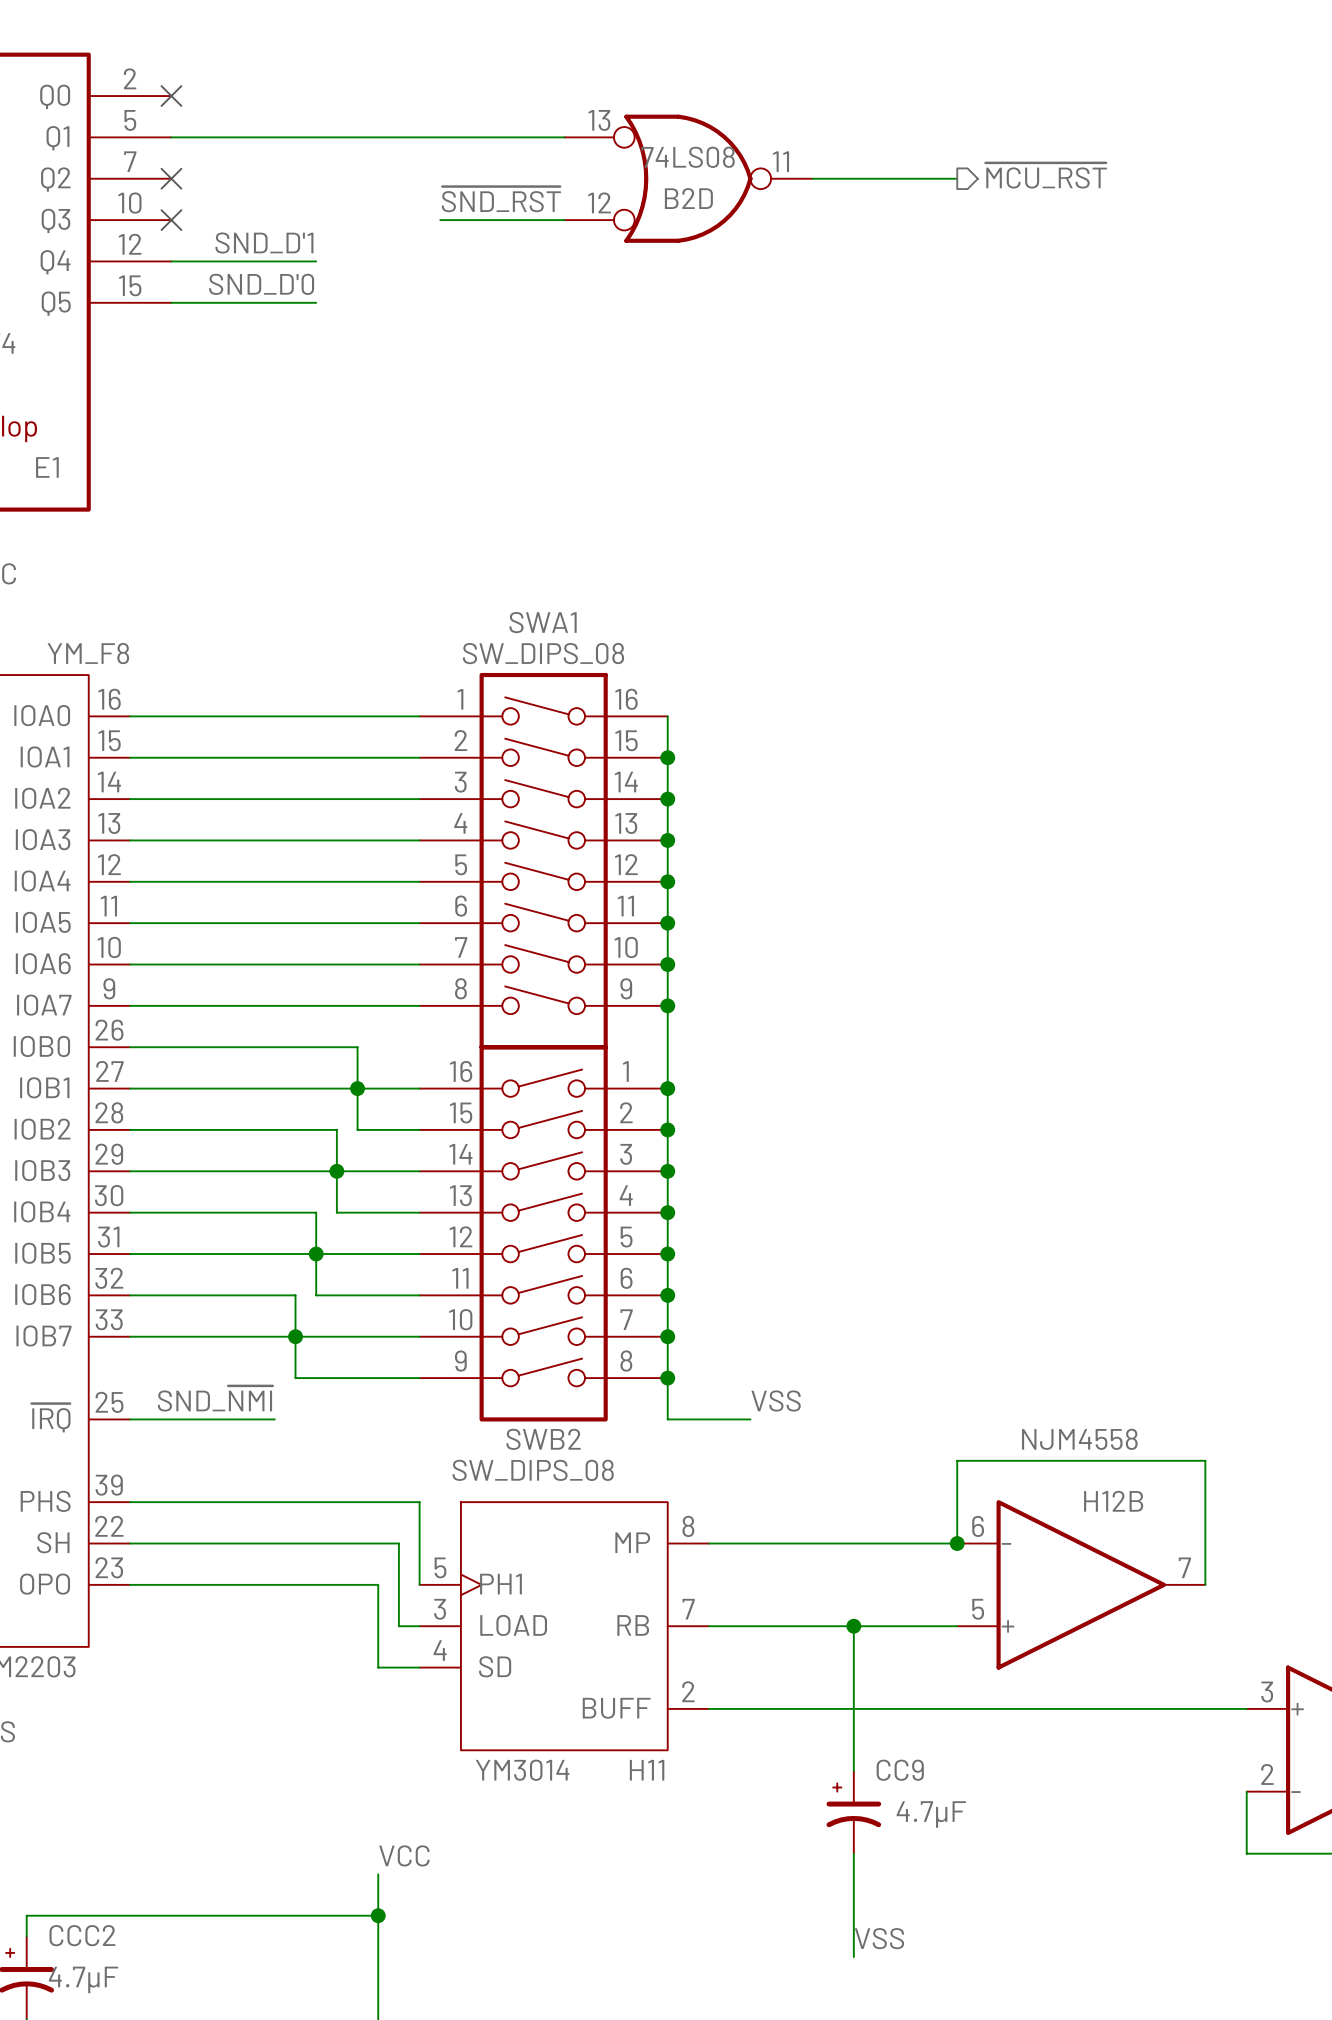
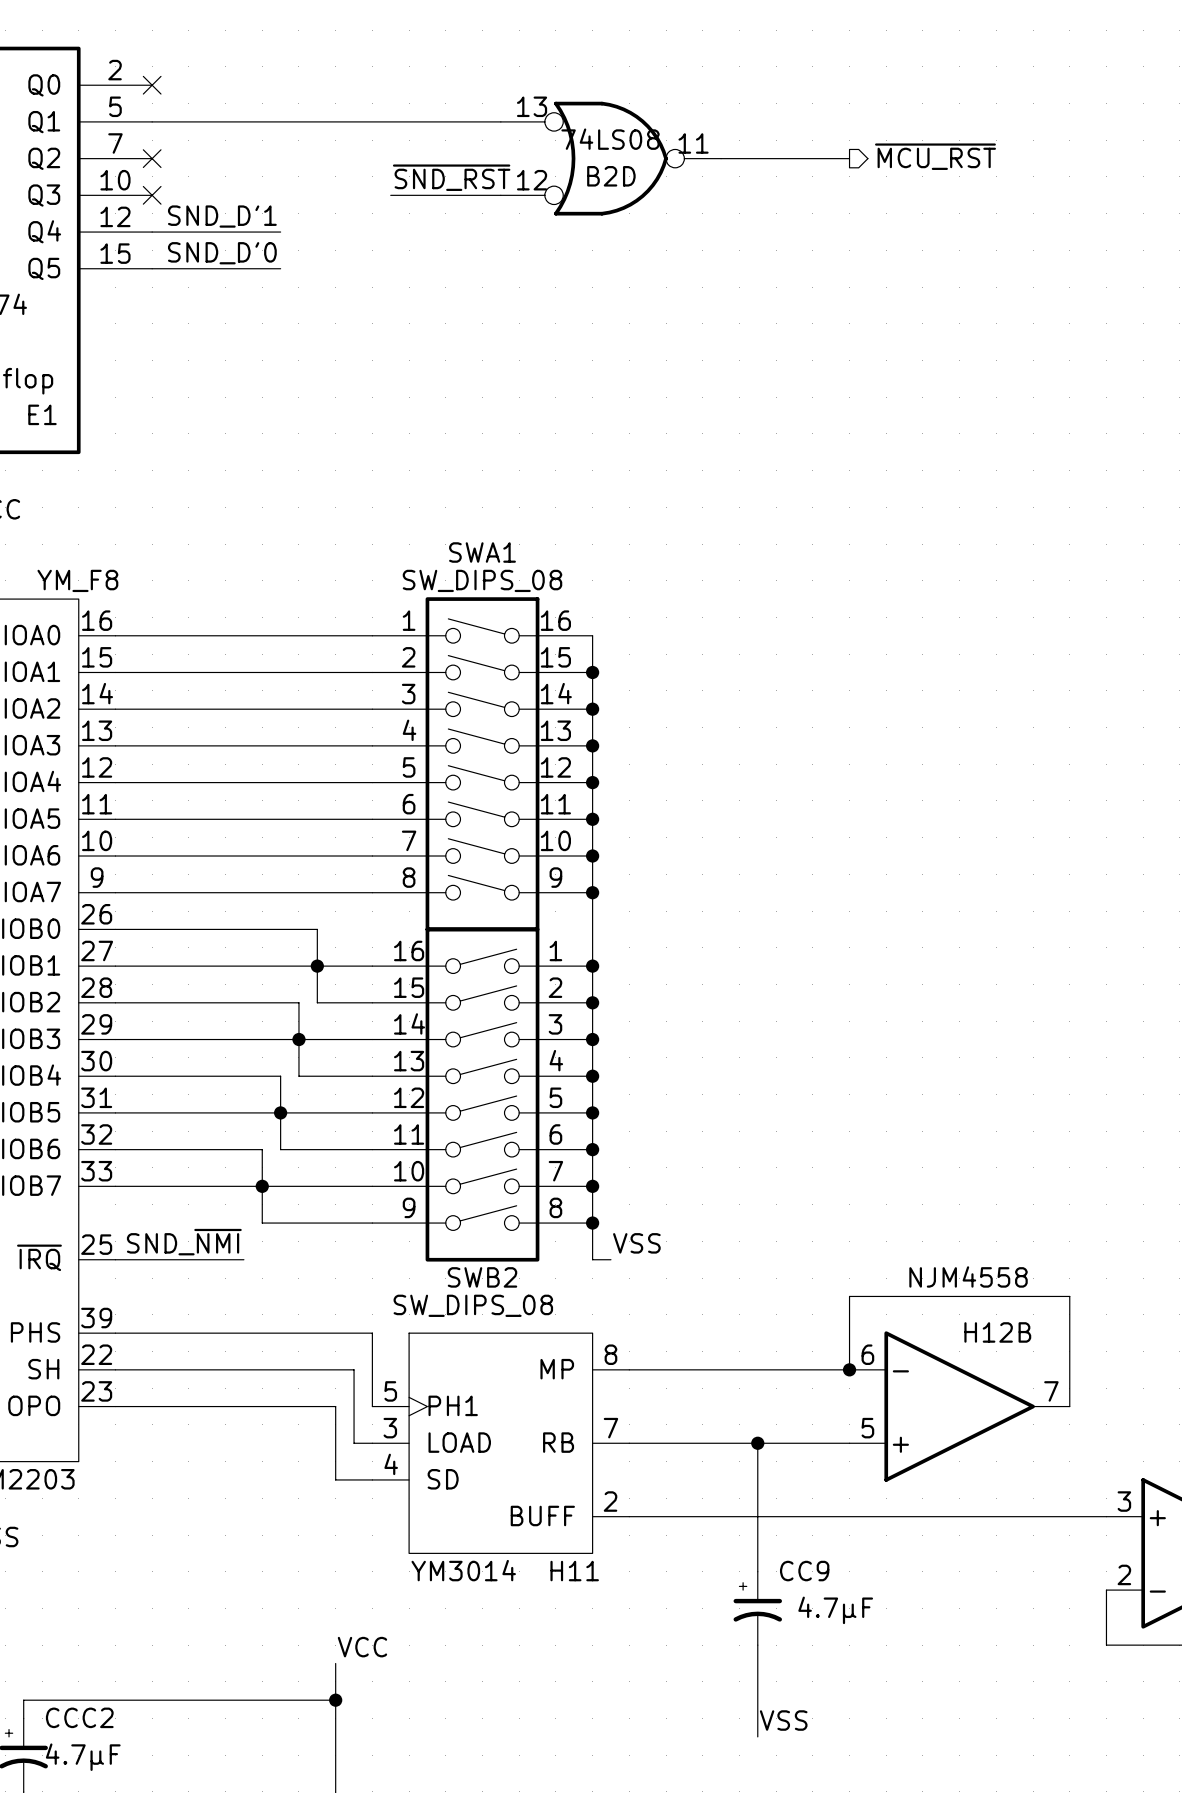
label position: VSS (776, 1400) -> VSS (636, 1243)
wire: (688, 1419) (750, 1419) -> none

